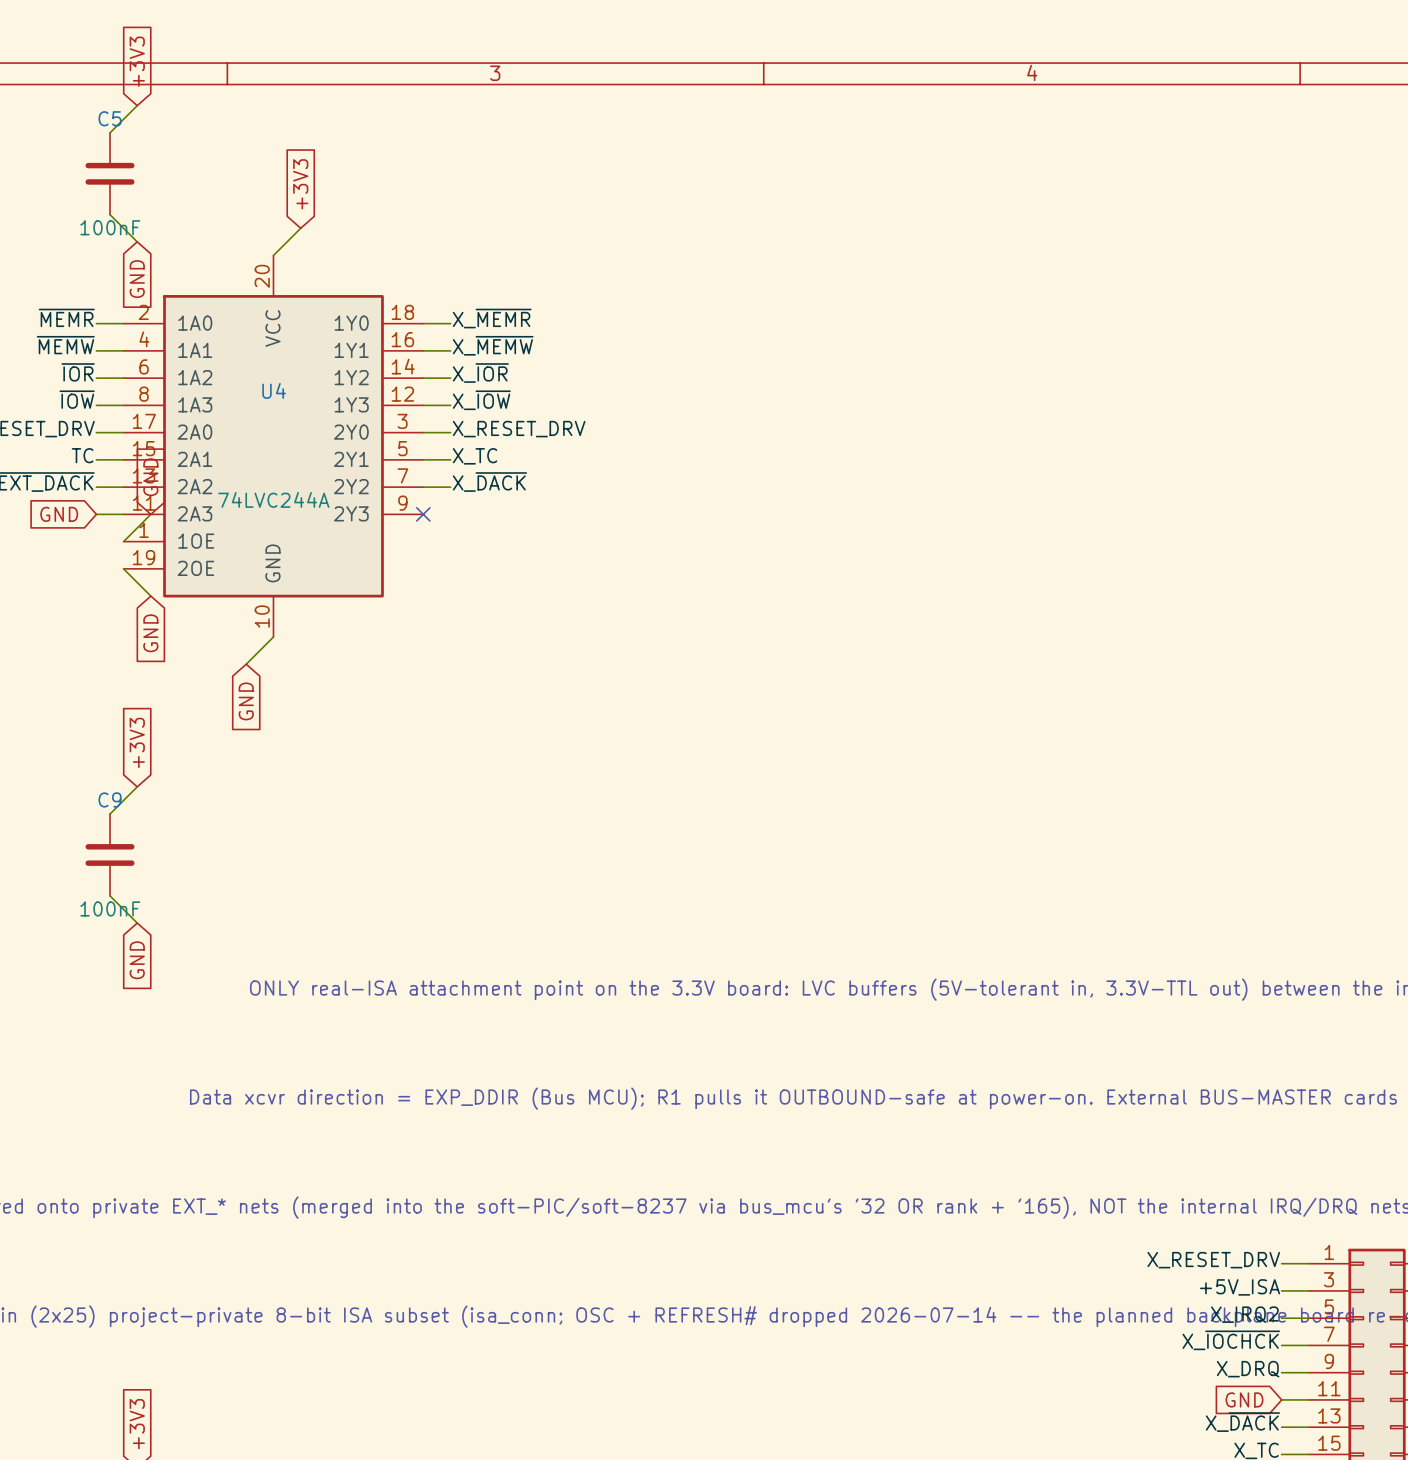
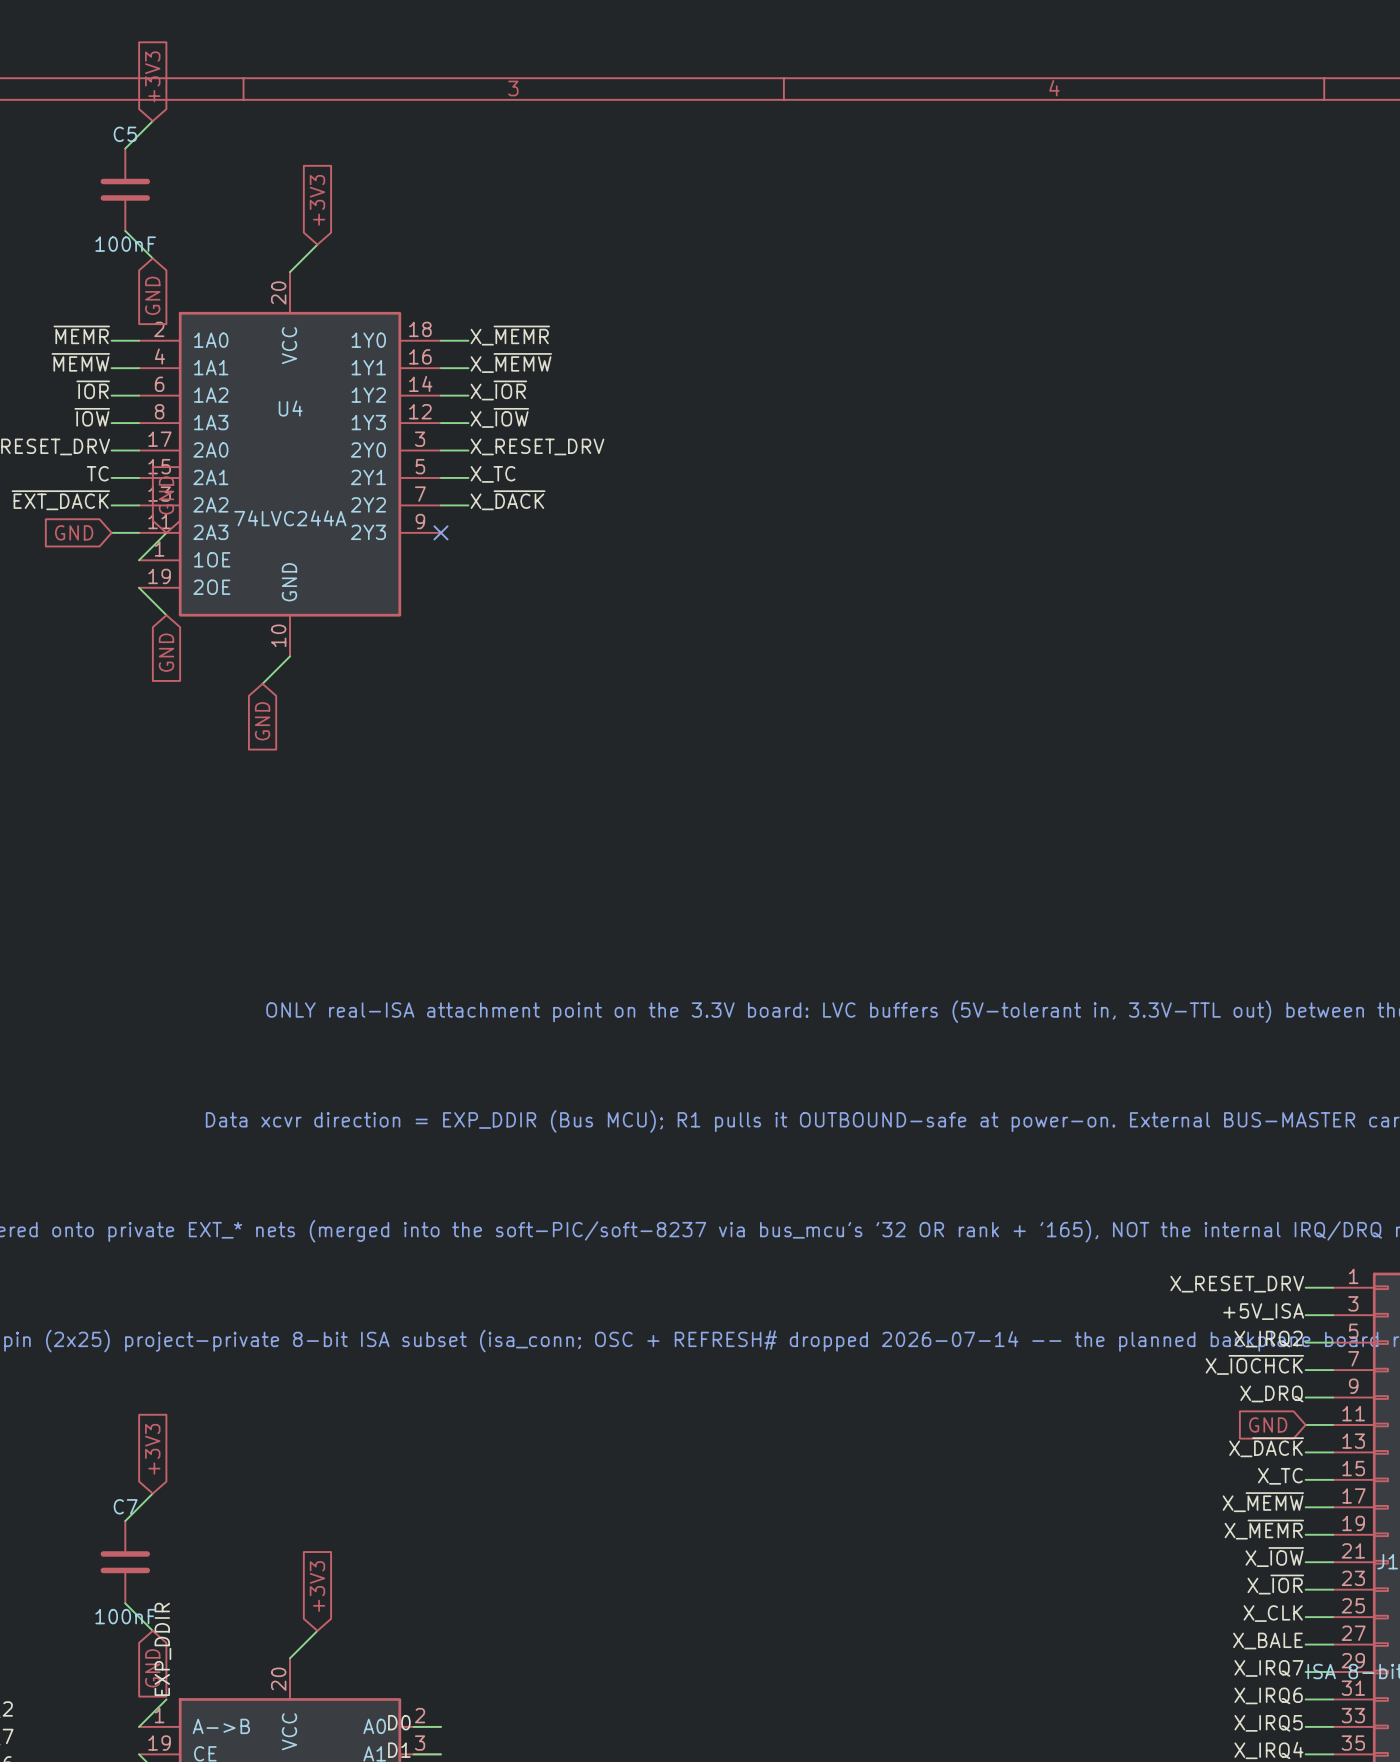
global label: +3V3 (137, 742) -> none
wire: (137, 786) (109, 814) -> none
C9: 100nF (109, 854) -> none
wire: (109, 895) (137, 923) -> none
global label: GND (137, 960) -> none

